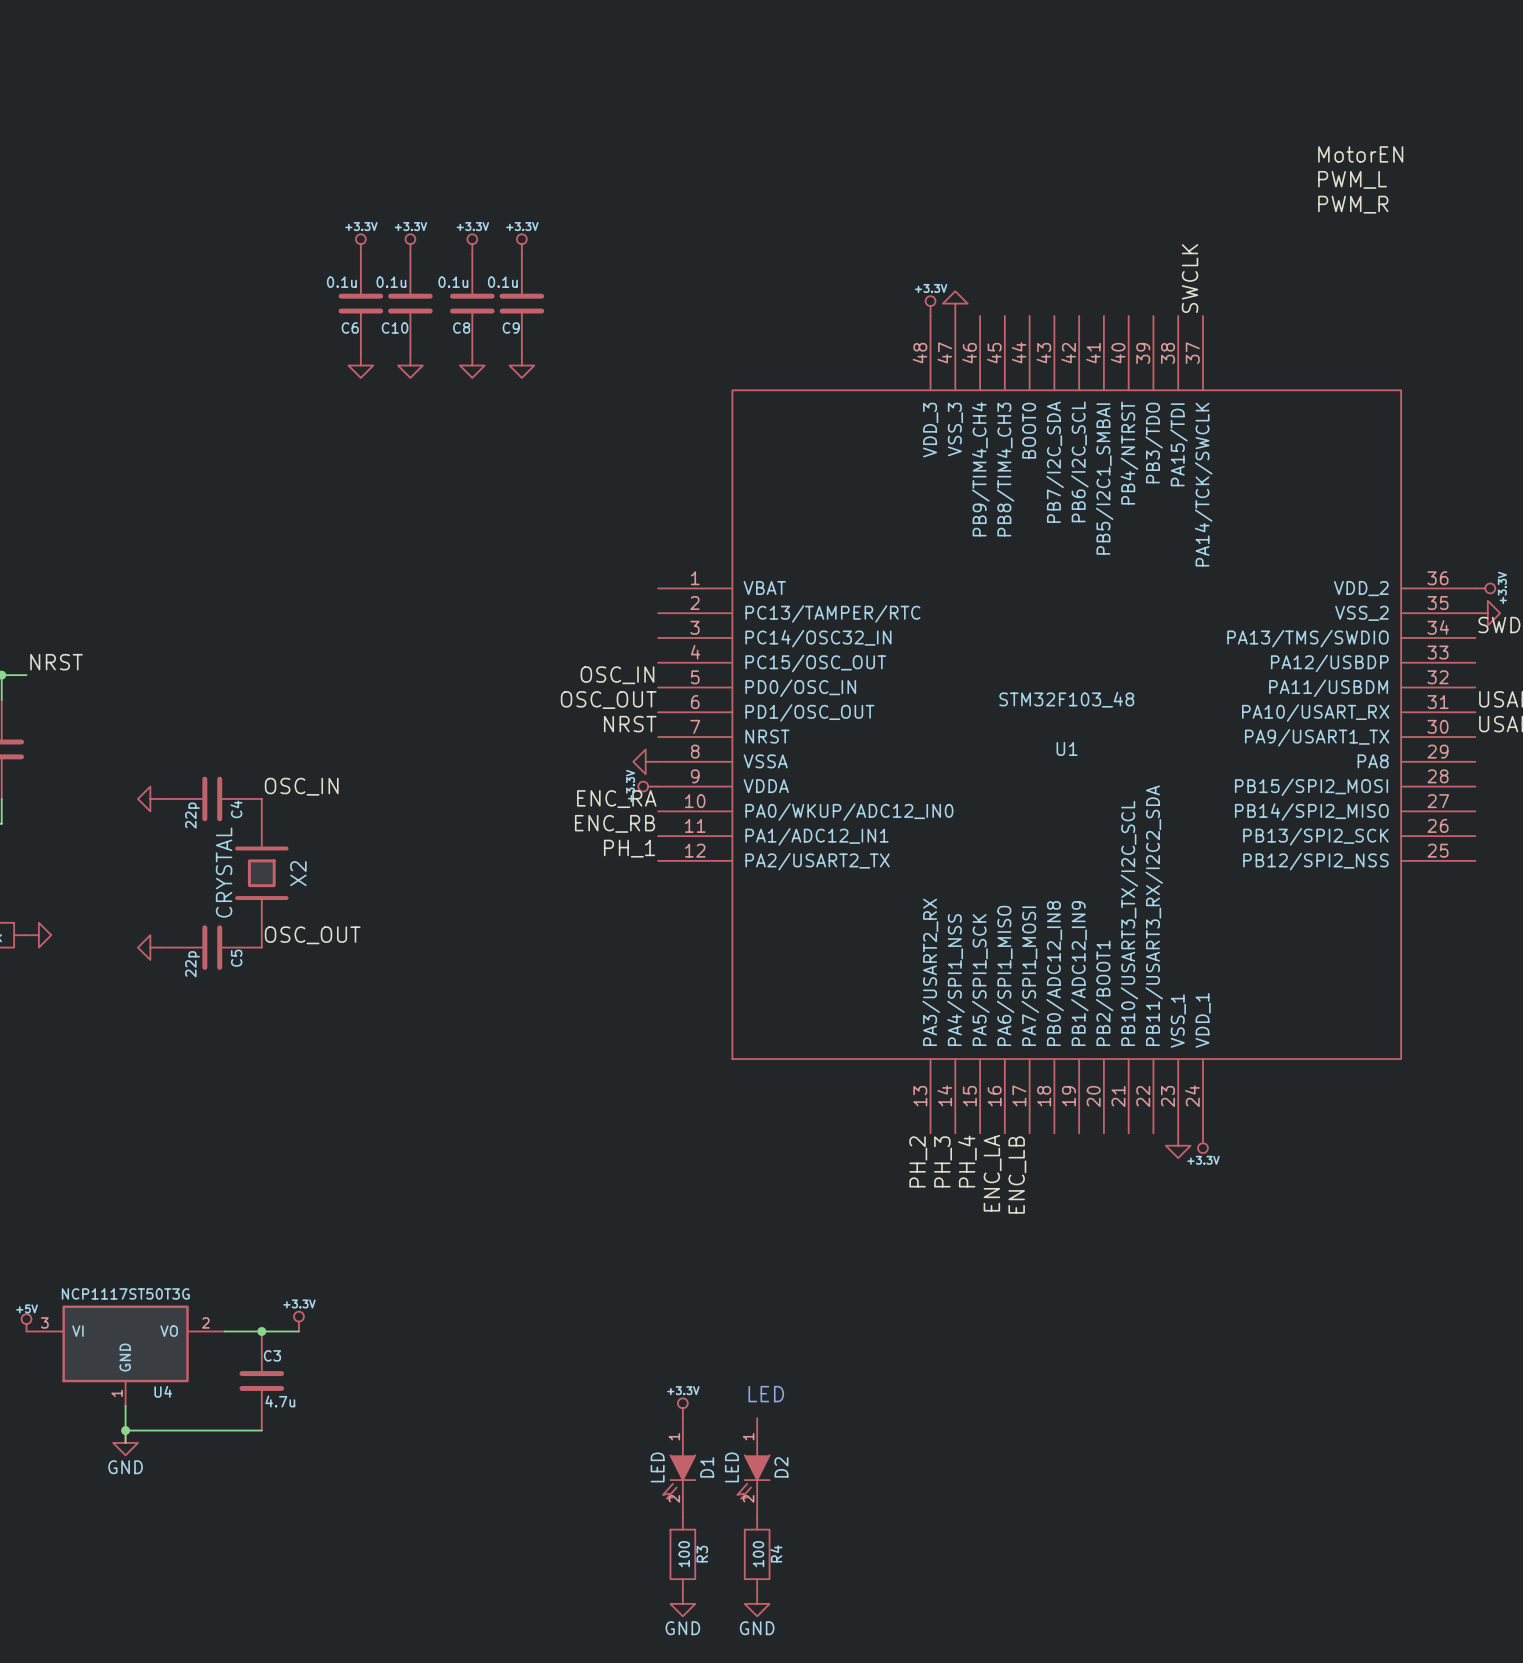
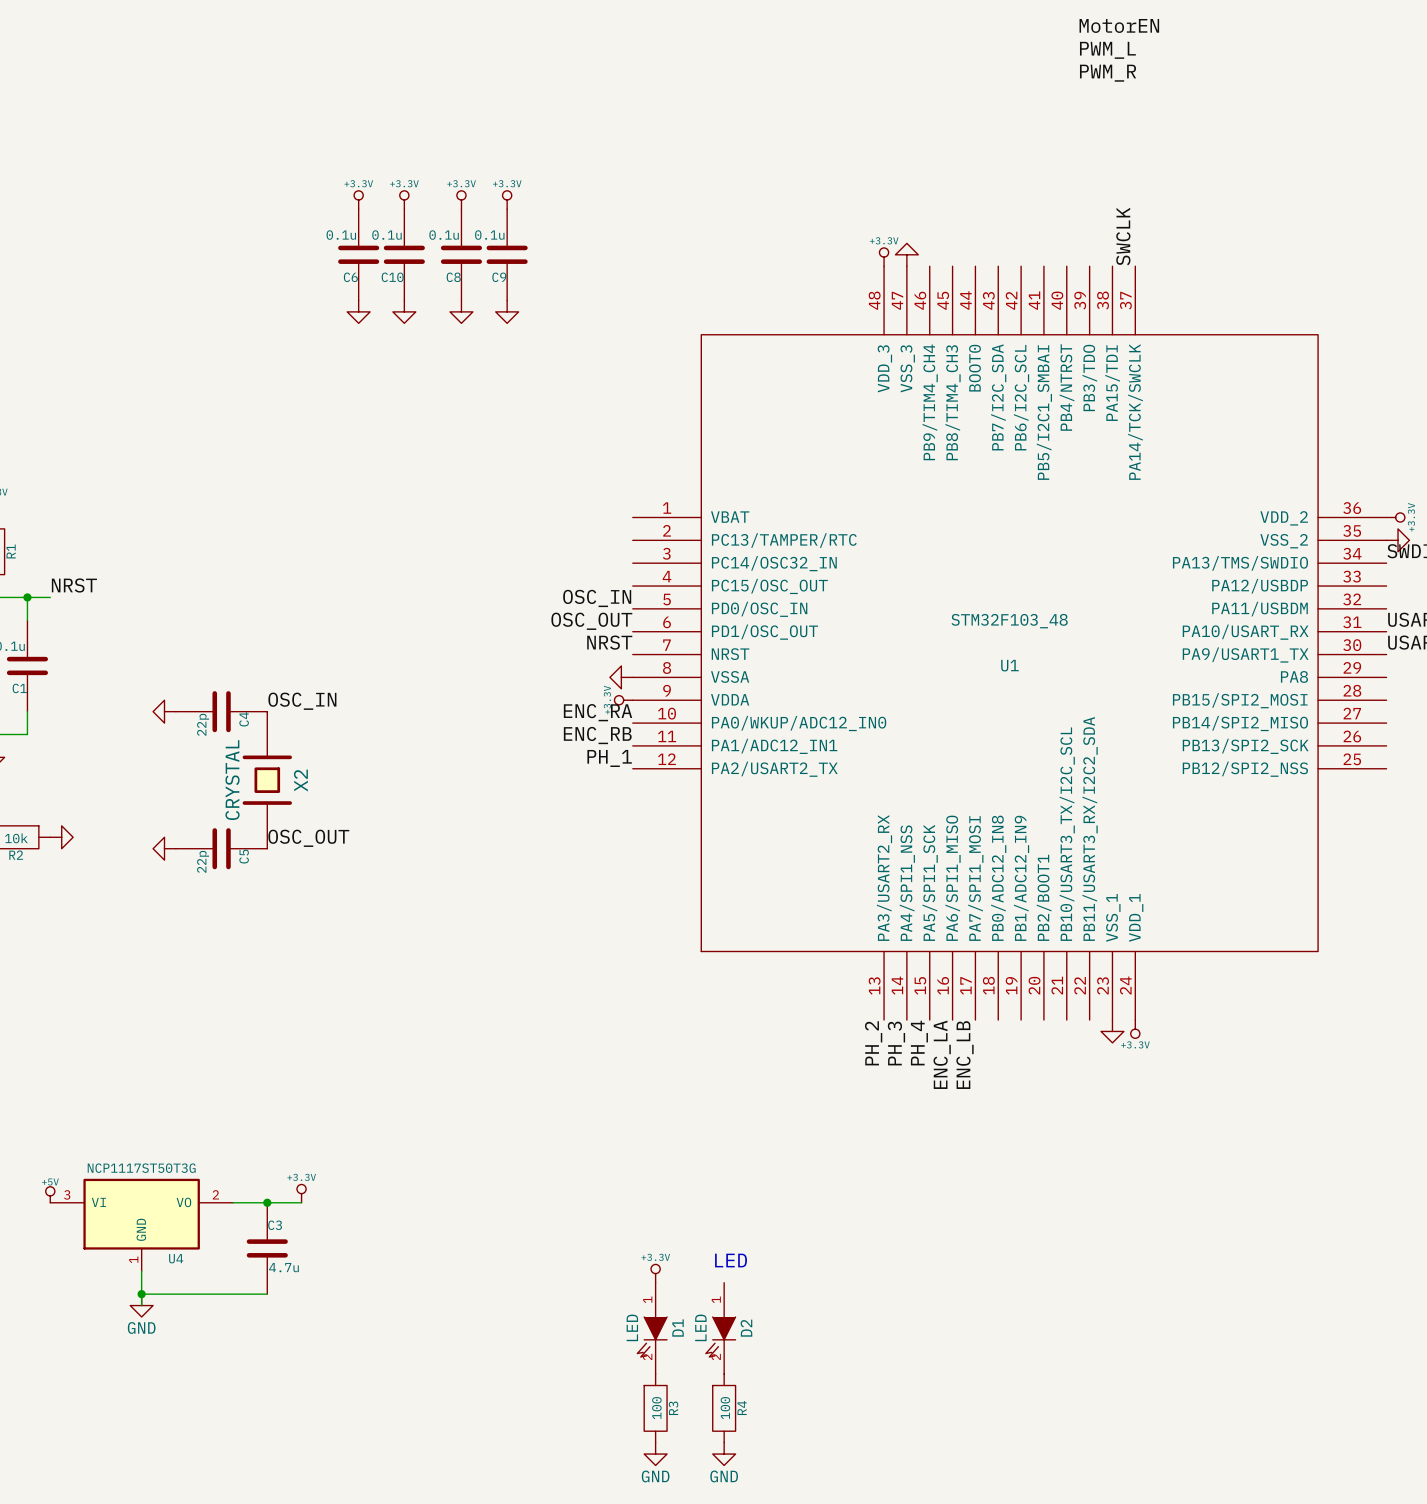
label position: MotorEN (1360, 154) -> MotorEN (1119, 25)
label position: PWM_L (1352, 179) -> PWM_L (1107, 50)
label position: PWM_R (1353, 204) -> PWM_R (1108, 73)

